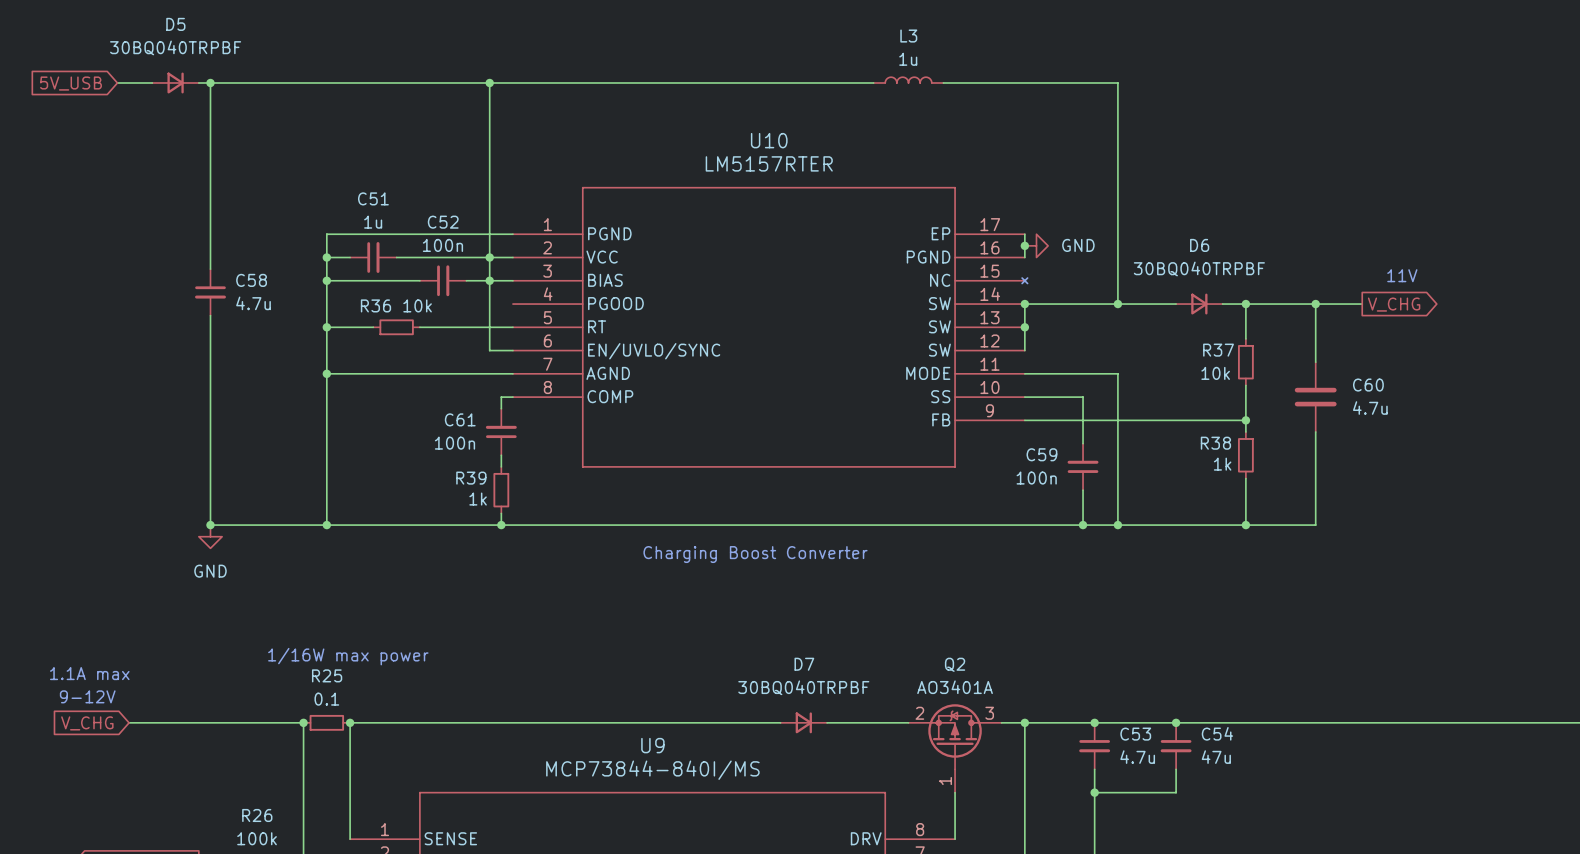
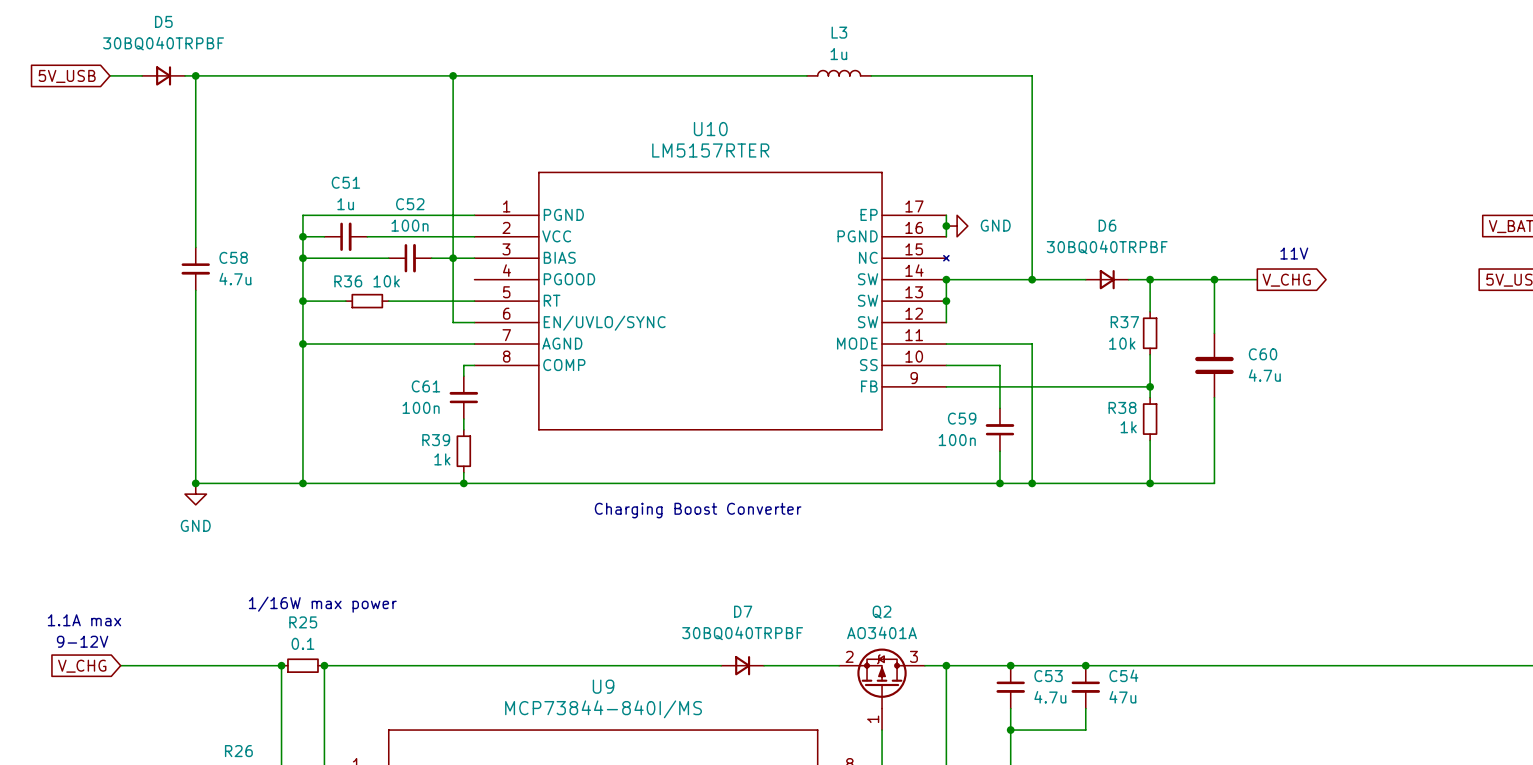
junction: (489, 257) -> none

